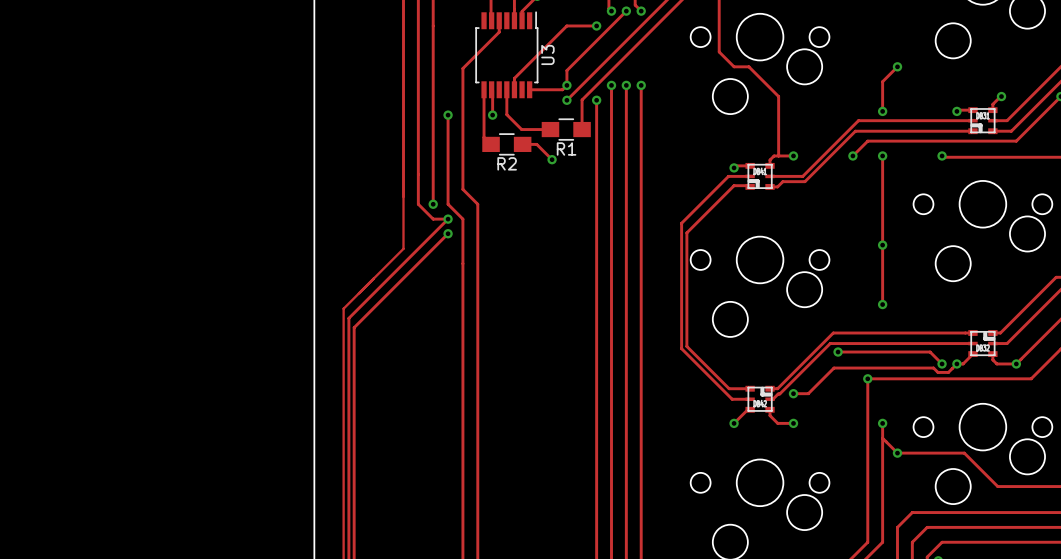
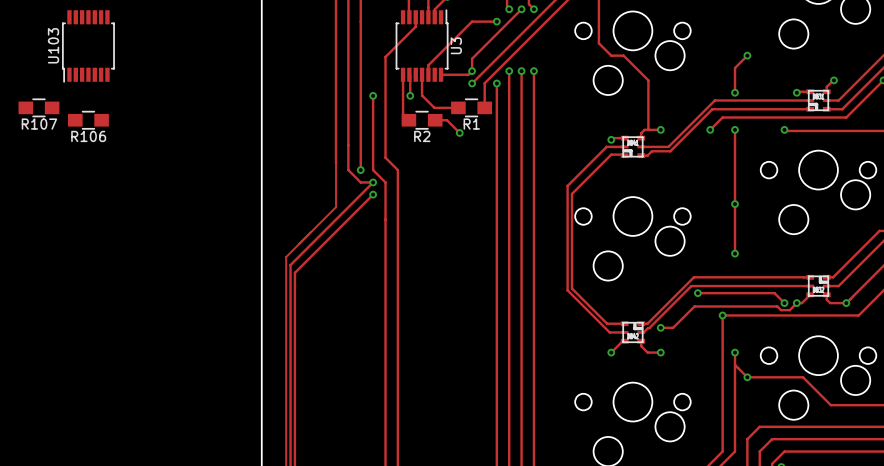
U103: none -> (88, 46)
R107: none -> (38, 107)
R106: none -> (88, 120)

